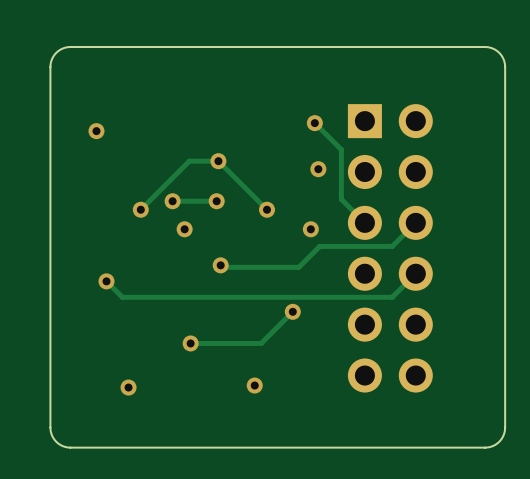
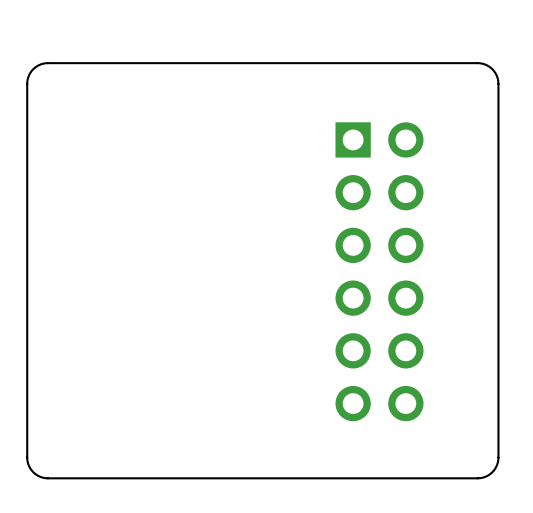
track: (314, 123) (341, 149) (341, 199) (364, 222) -> none
via: (314, 123) -> none
via: (96, 131) -> none
via: (218, 161) -> none
via: (318, 169) -> none
via: (172, 201) -> none
track: (216, 201) (172, 201) -> none
via: (216, 201) -> none
via: (140, 209) -> none
track: (267, 209) (218, 161) (189, 161) (140, 209) -> none
via: (267, 209) -> none
track: (415, 222) (392, 246) (319, 246) (298, 267) (222, 267) (220, 265) -> none
via: (184, 229) -> none
via: (310, 229) -> none
via: (220, 265) -> none
track: (415, 273) (392, 297) (122, 297) (106, 281) -> none
via: (106, 281) -> none
track: (292, 311) (261, 343) (190, 343) -> none
via: (292, 311) -> none
via: (190, 343) -> none
via: (254, 385) -> none
via: (128, 387) -> none

